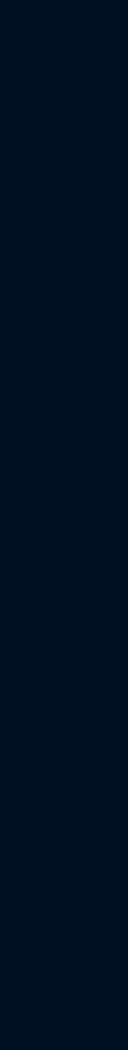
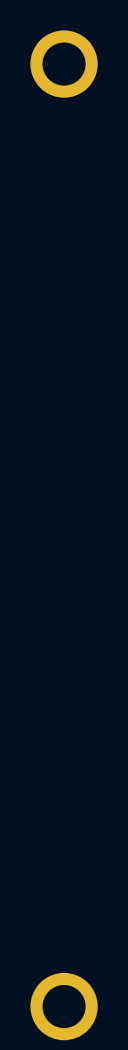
part: none -> (64, 64)
part: none -> (64, 1006)

